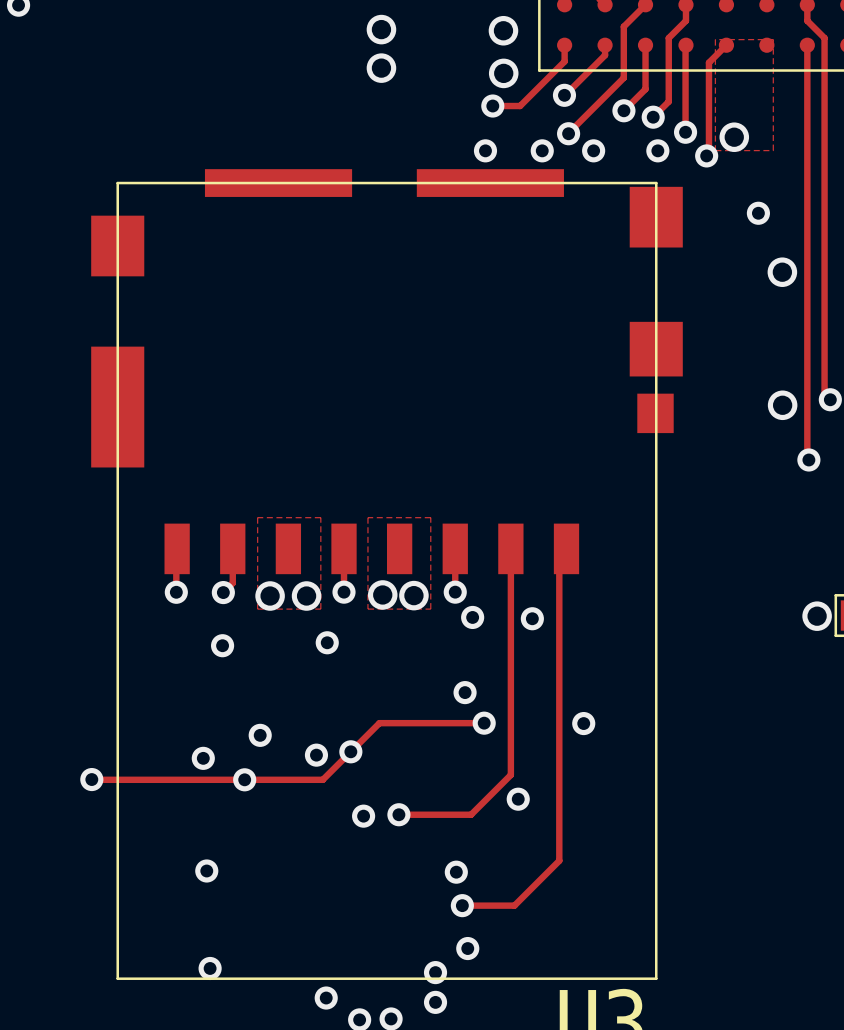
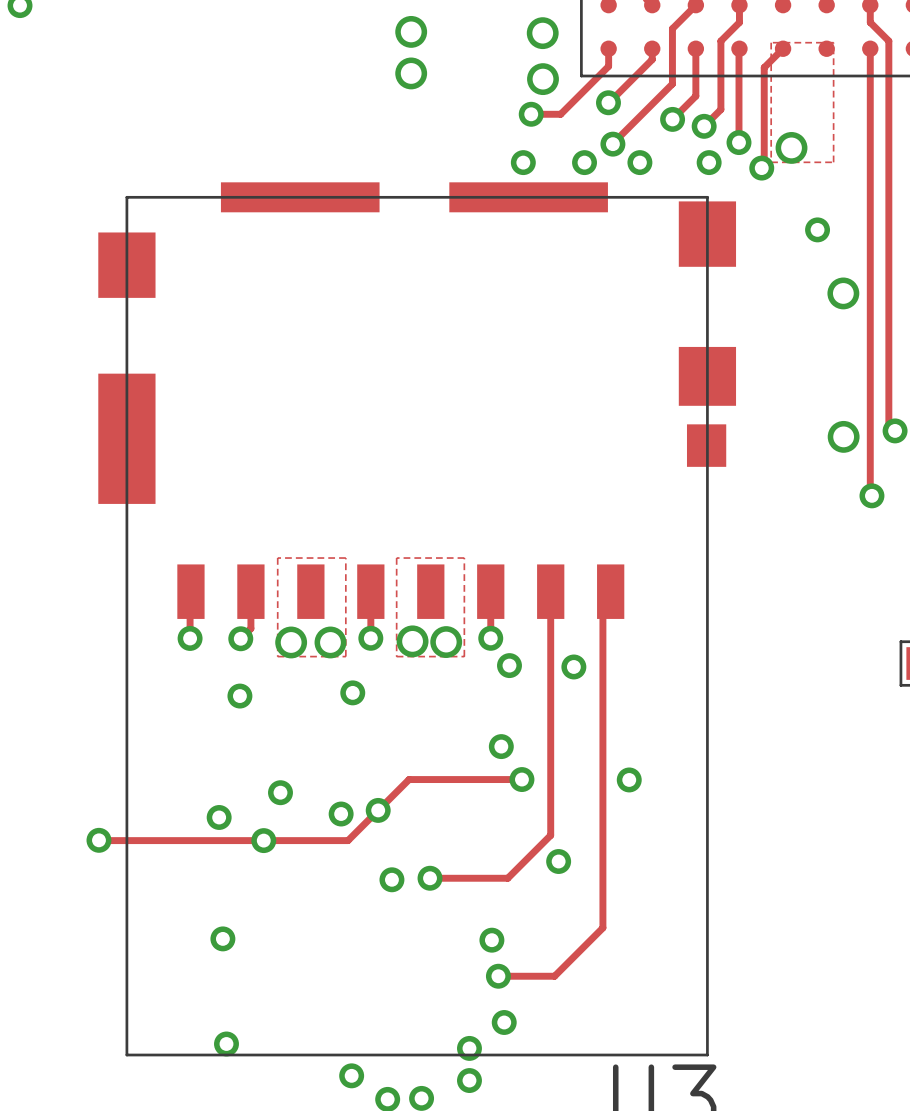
via: (817, 616) -> none

